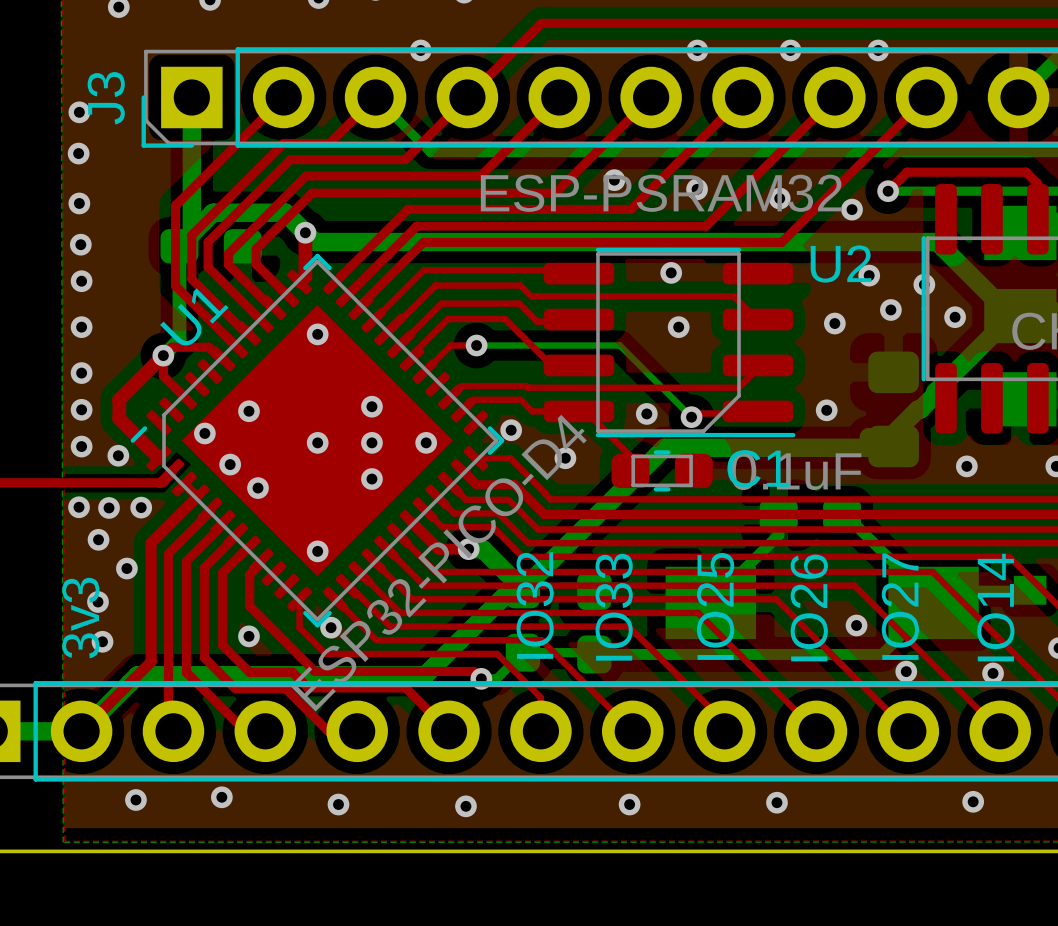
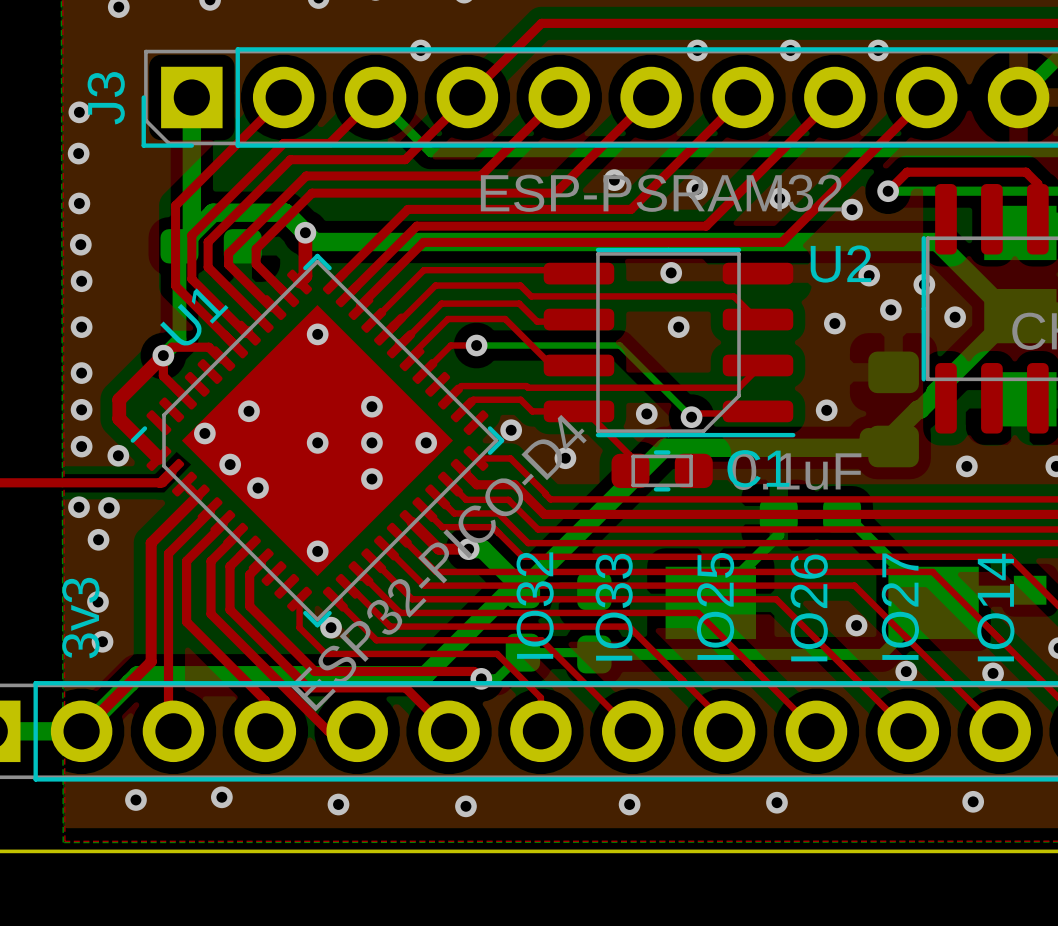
via: (141, 507) -> none
top track: (248, 547) (222, 572) (222, 645) (249, 672) (292, 672) -> (248, 547) (229, 566) (229, 609) (292, 672)
top track: (211, 561) (204, 567) (204, 658) (235, 688) (285, 688) -> (211, 561) (211, 614) (285, 688)
via: (126, 568) -> none
top track: (186, 621) (186, 672) (245, 731) (265, 731) -> (186, 621) (265, 700) (265, 731)
via: (248, 636) -> none

